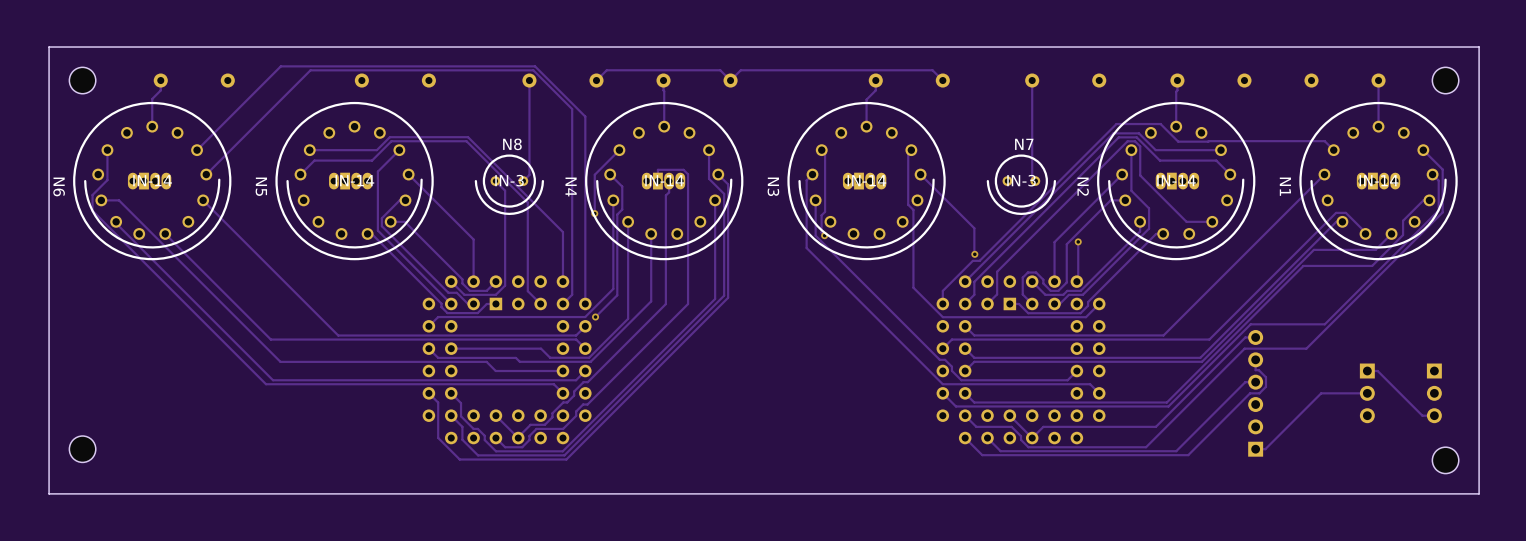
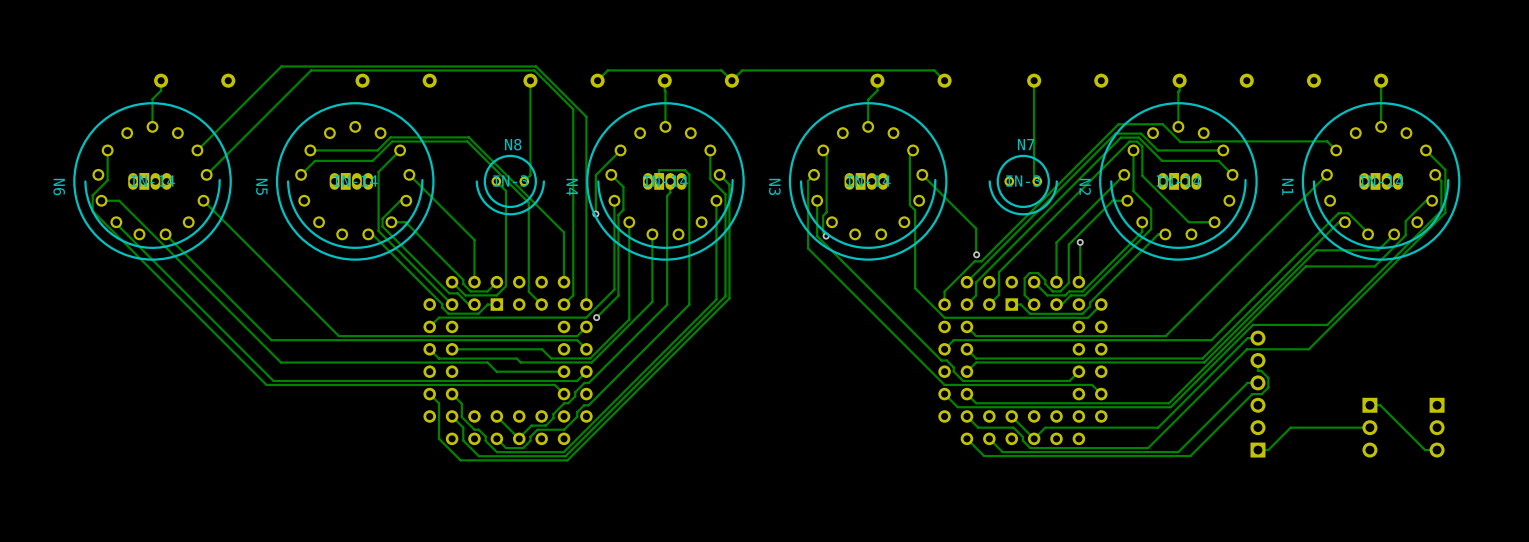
board edge: (1479, 47) (49, 47) (49, 493) (1479, 493) (1479, 47) -> none
part: (82, 80) -> none
part: (1445, 80) -> none
track: (1367, 371) (1377, 371) (1422, 415) (1434, 415) -> (1369, 405) (1380, 405) (1425, 450) (1437, 450)
track: (1367, 393) (1321, 393) (1265, 449) -> (1369, 427) (1290, 427) (1267, 450)
part position: (1367, 393) -> (1369, 427)
part position: (1434, 393) -> (1437, 427)
part: (82, 449) -> none
part: (1445, 460) -> none

